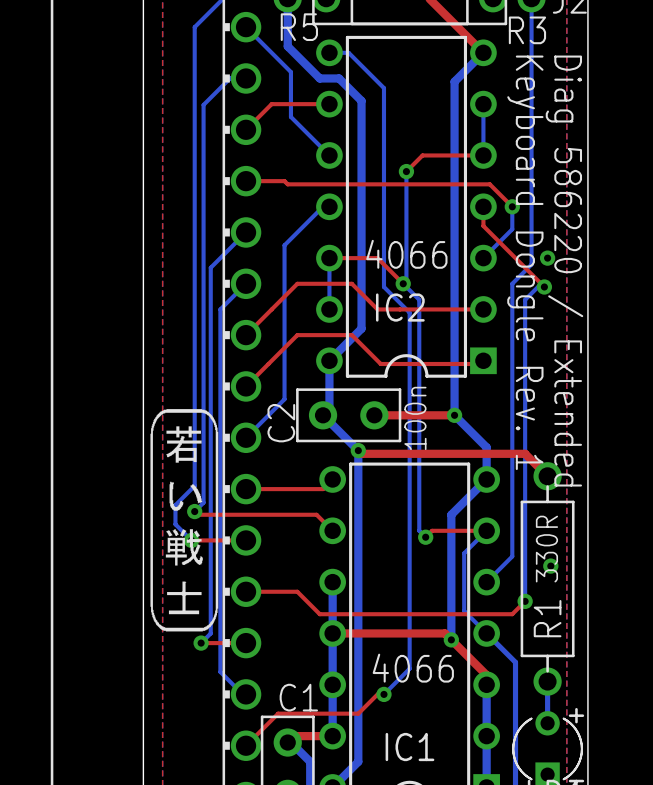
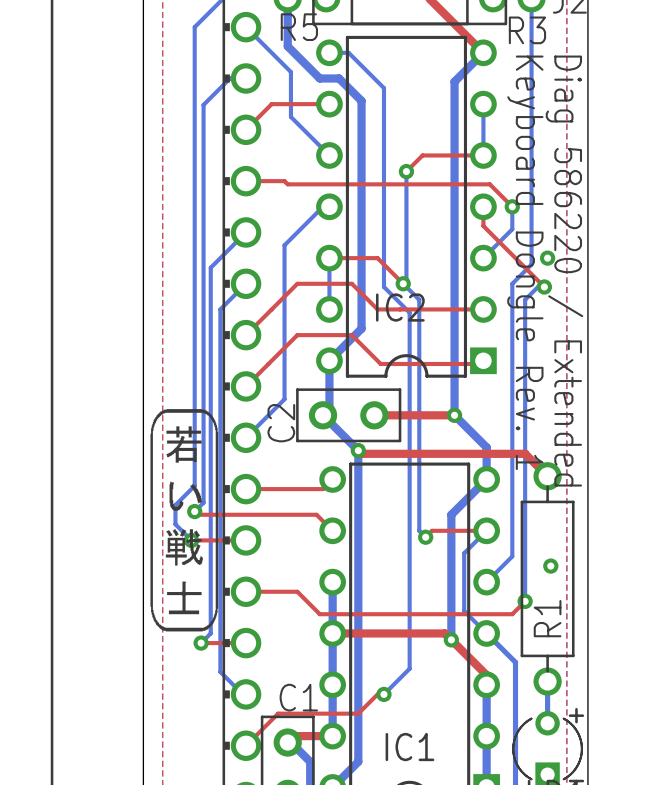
text: 4066 (406, 254) -> none
text: 100n (415, 418) -> none
text: 330R (546, 549) -> none
text: 4066 (413, 668) -> none

